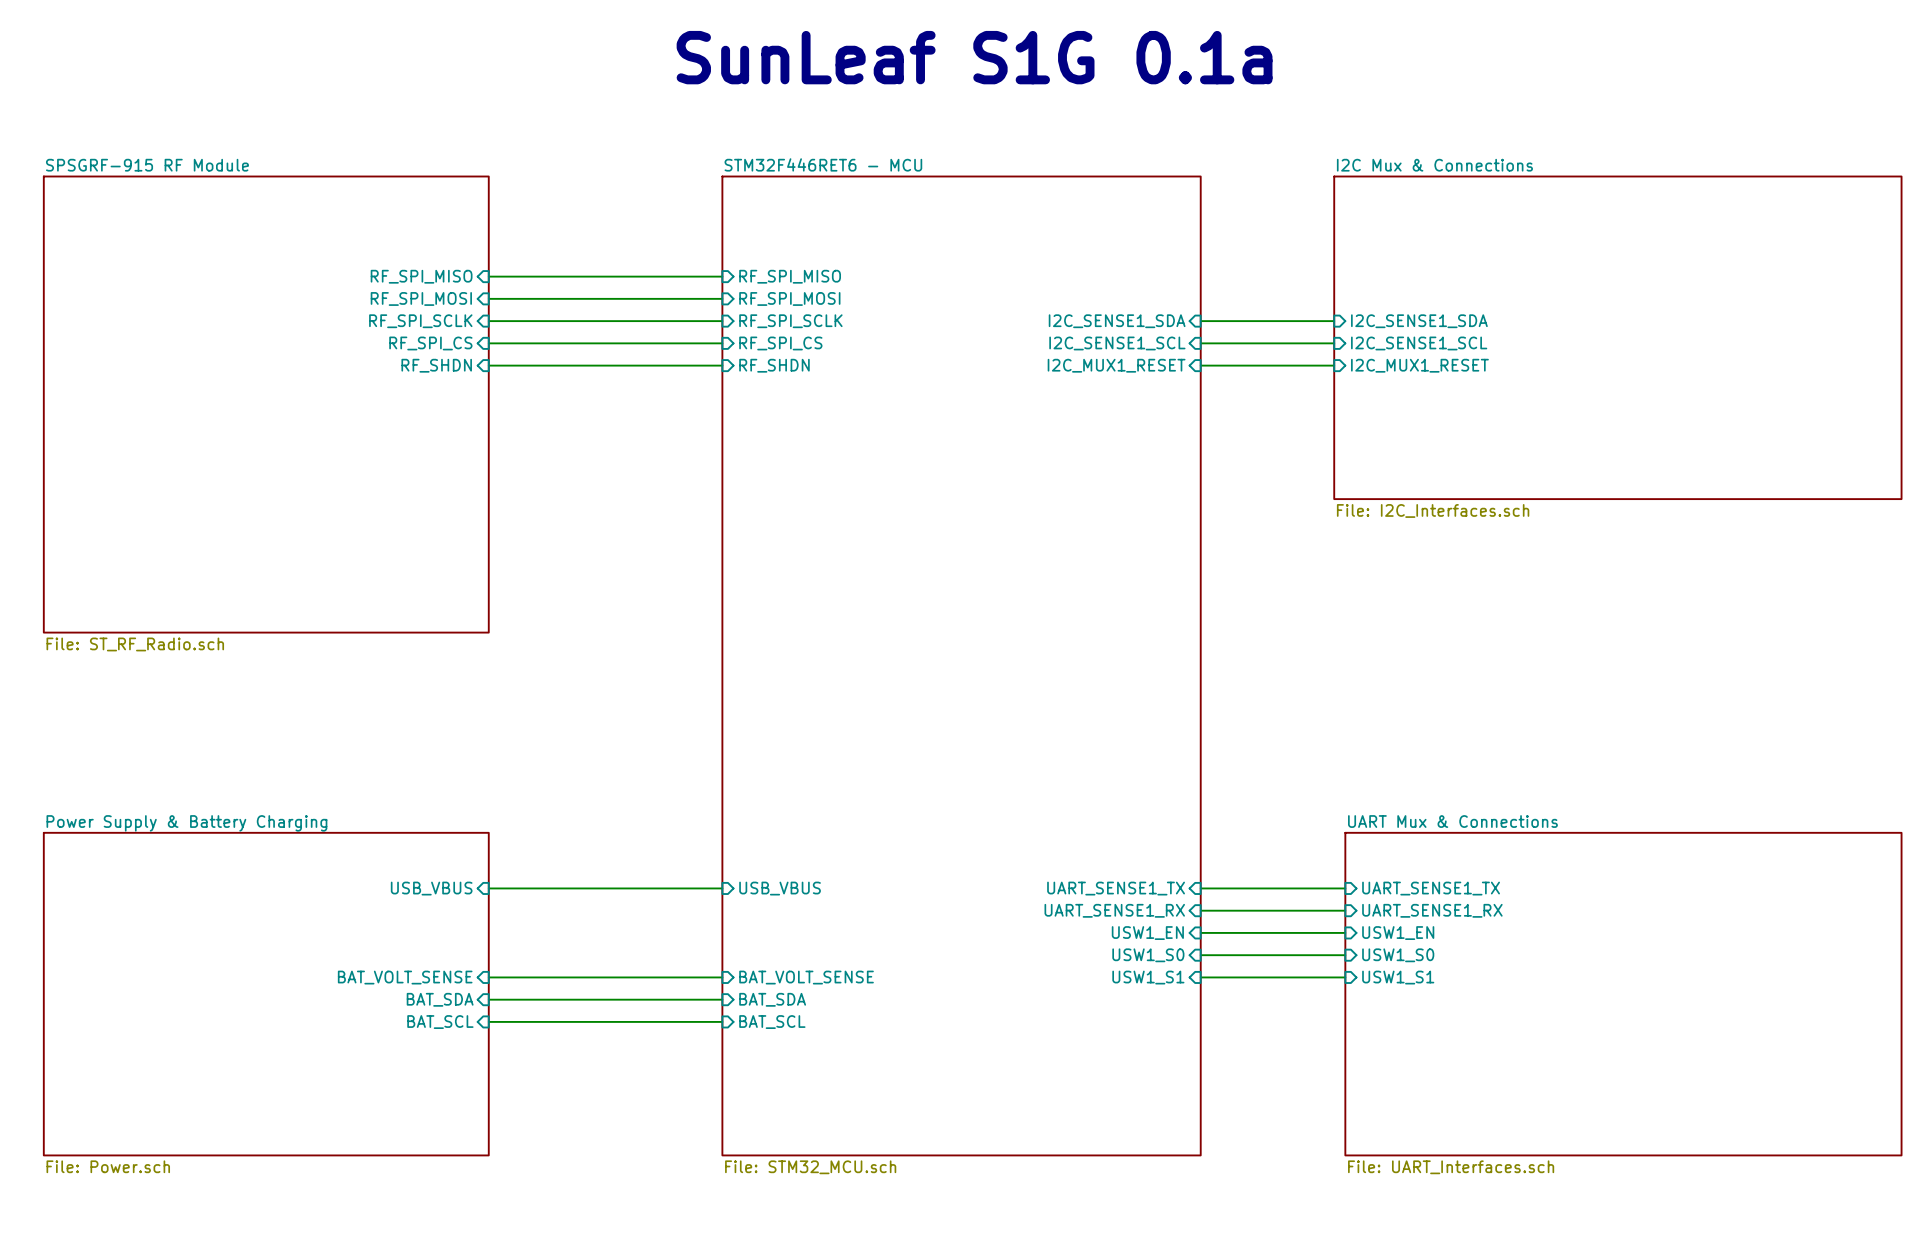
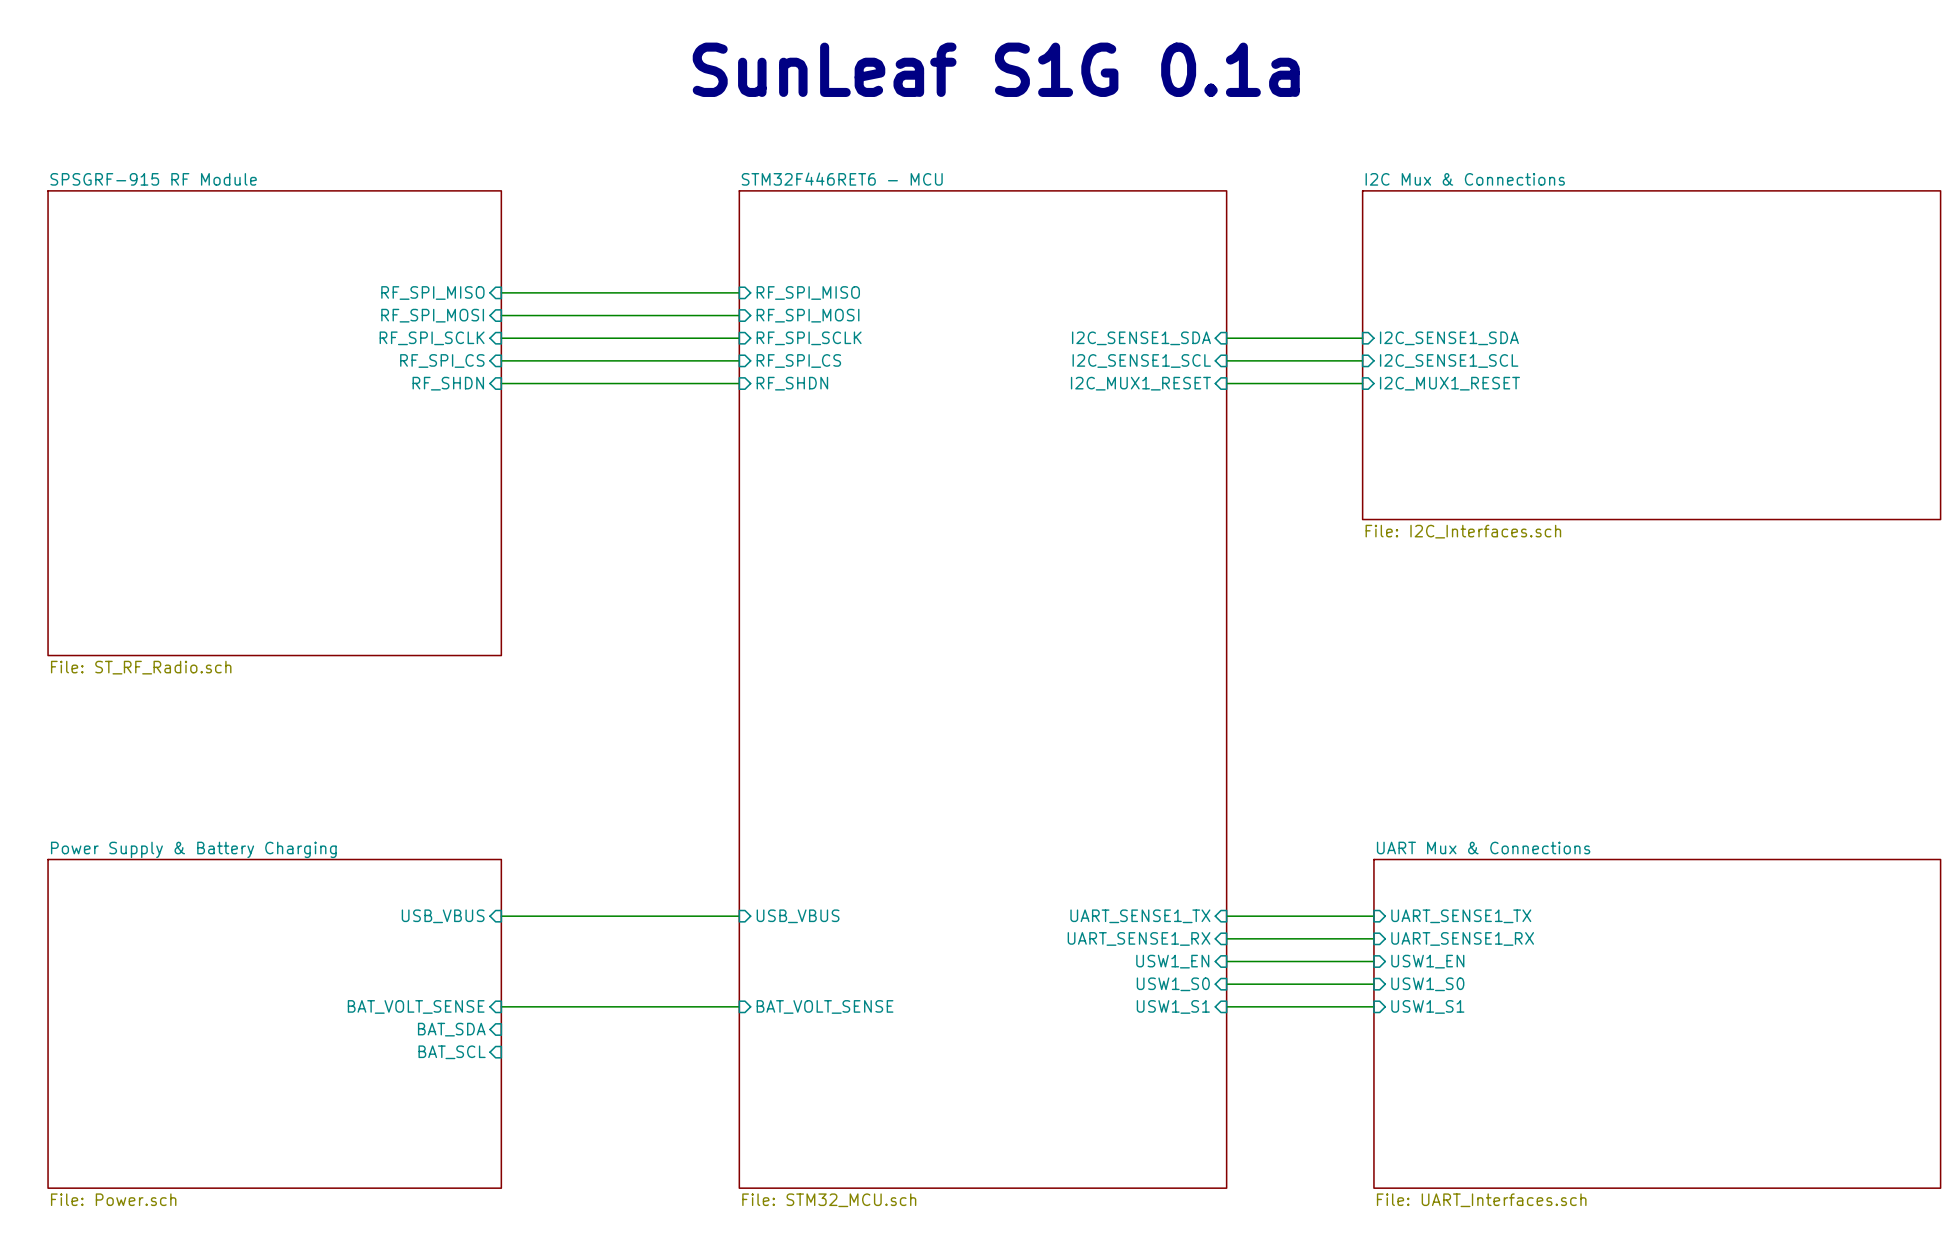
wire: (488, 999) (722, 999) -> none
sheet pin: BAT_SDA (772, 999) -> none
wire: (488, 1021) (722, 1021) -> none
sheet pin: BAT_SCL (772, 1022) -> none

